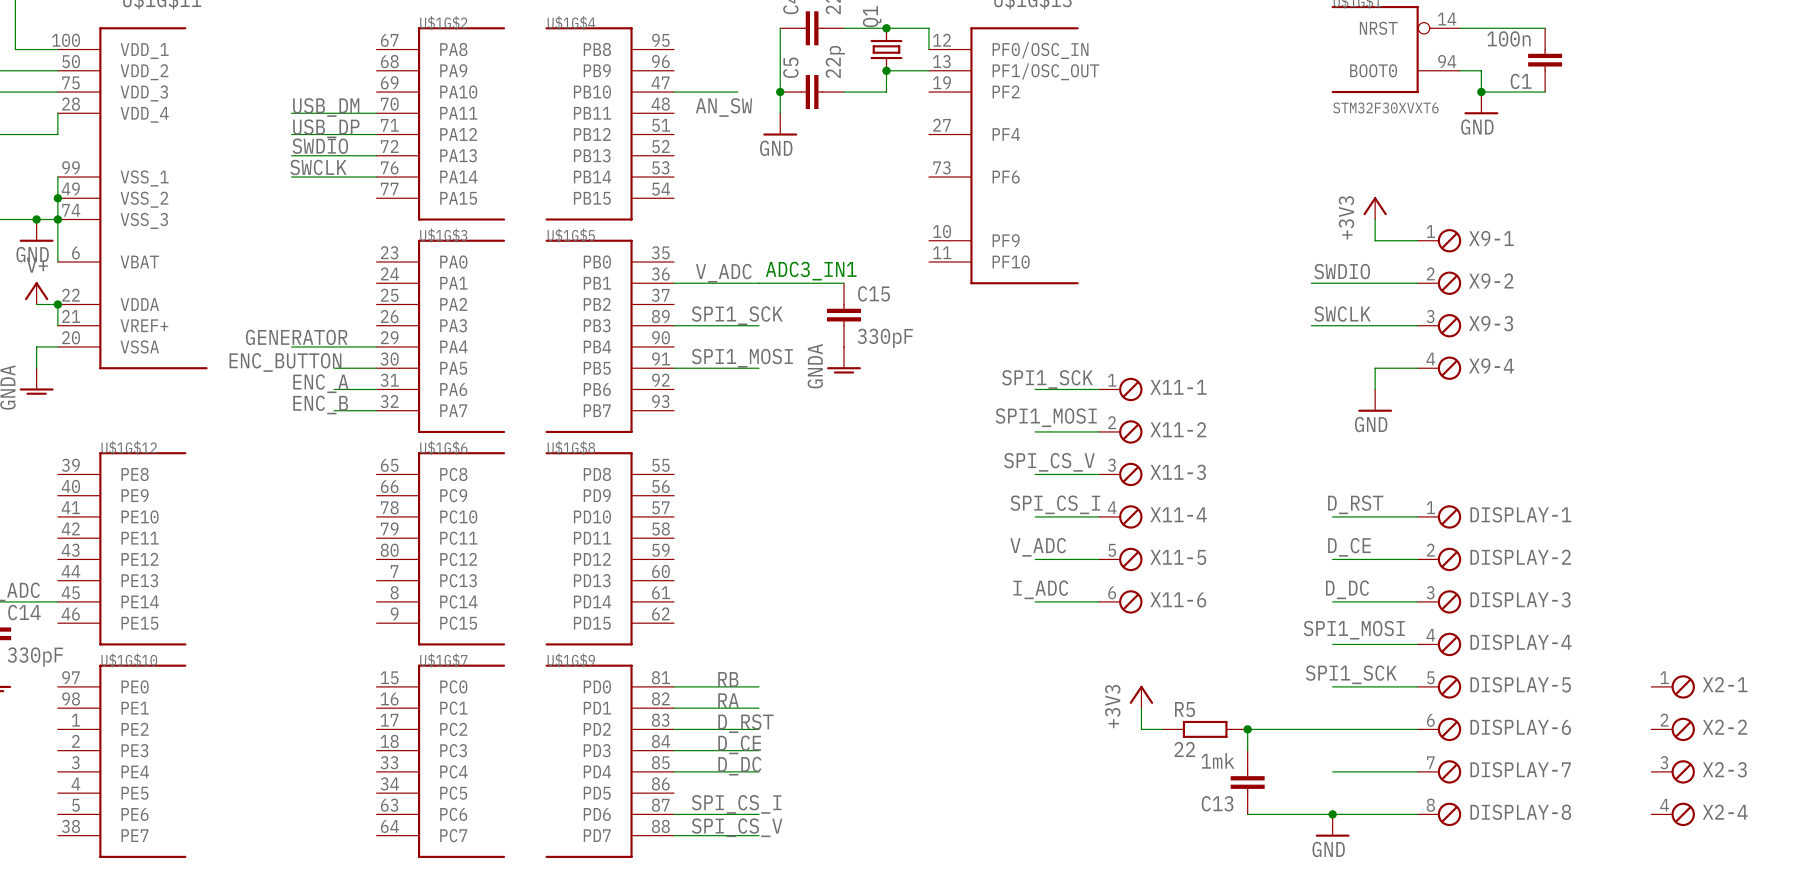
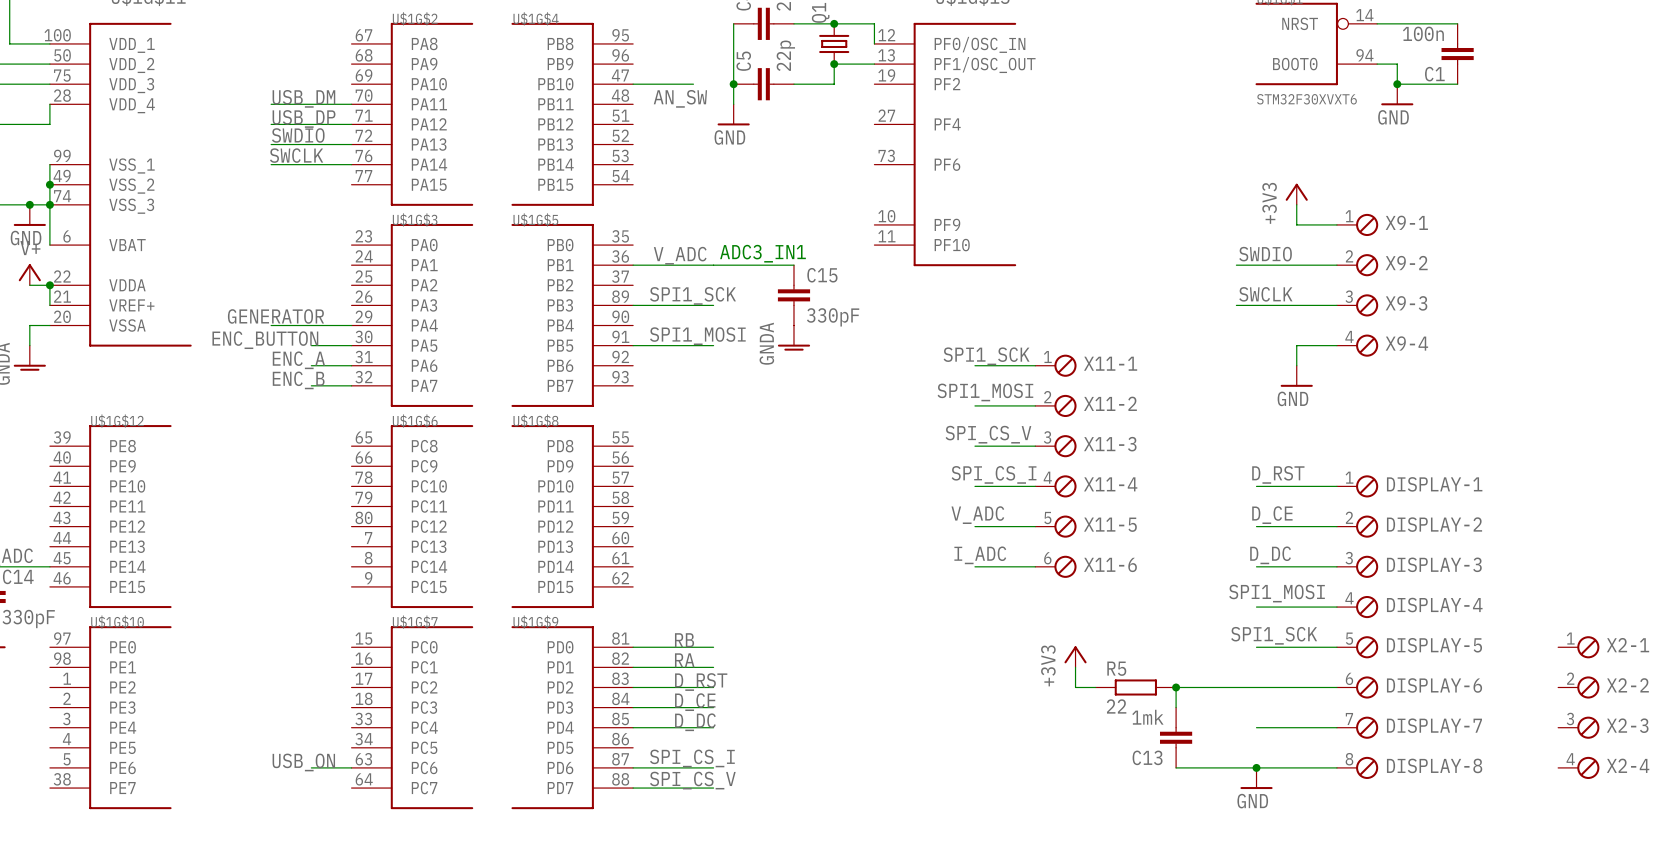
label: none -> USB_ON (303, 762)
wire: none -> (311, 767) (351, 767)

